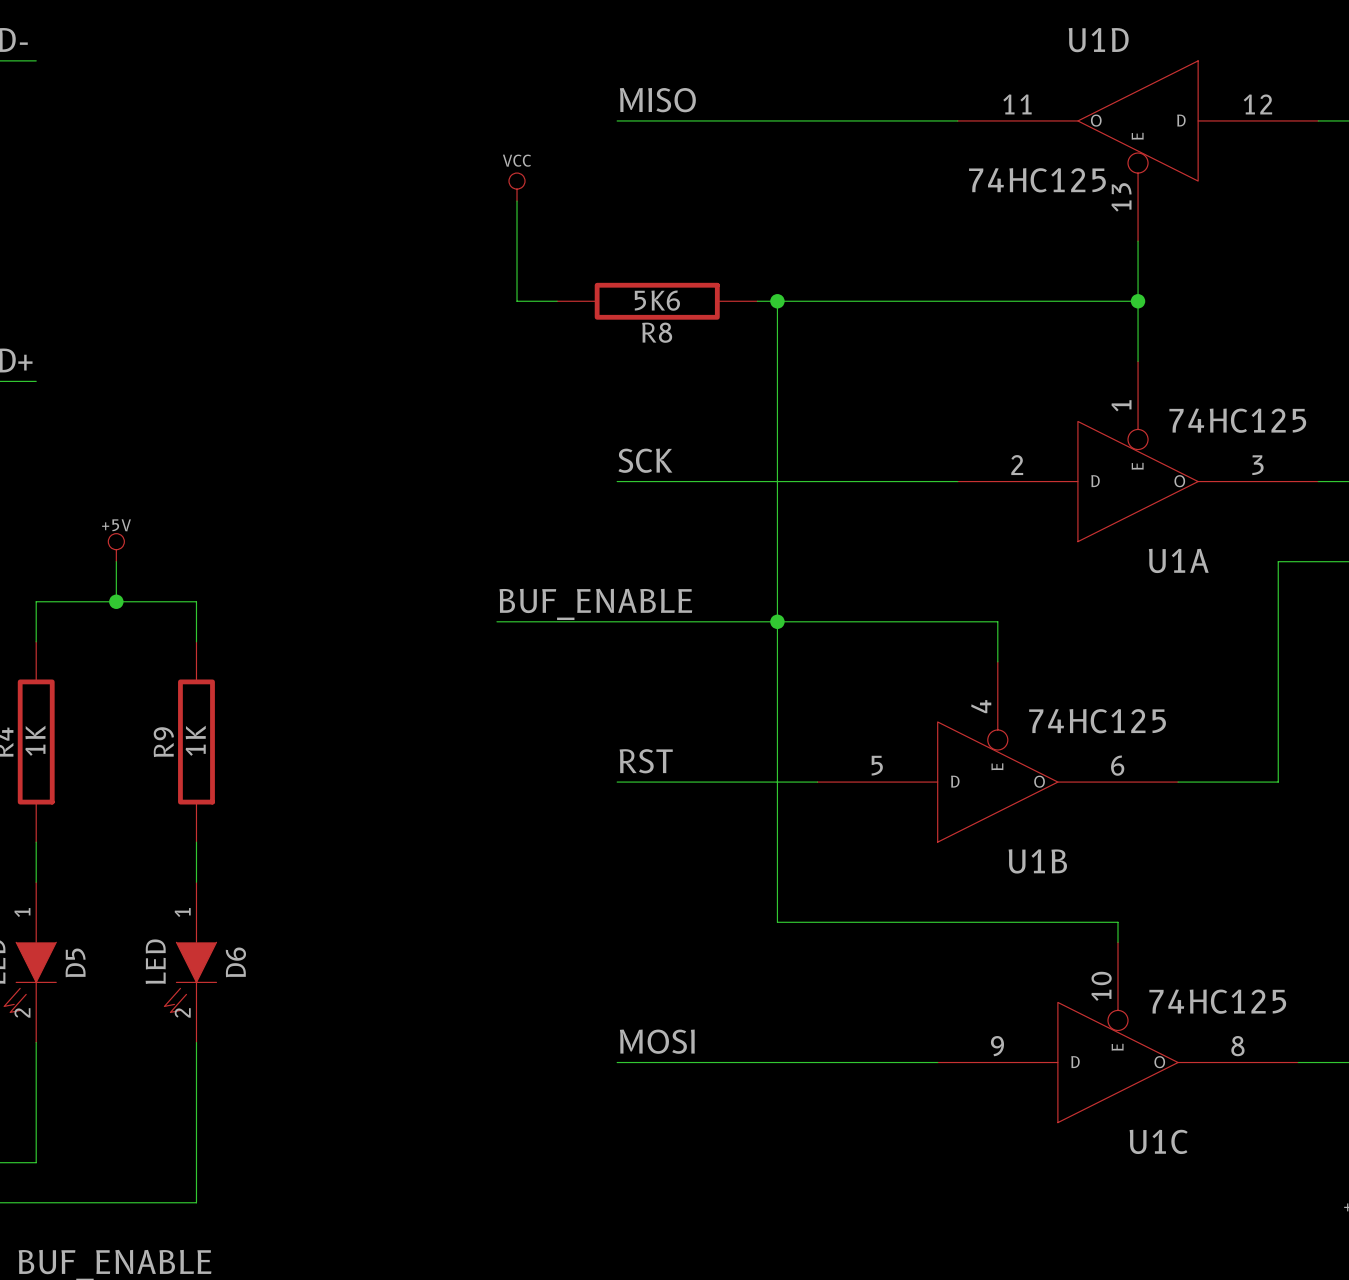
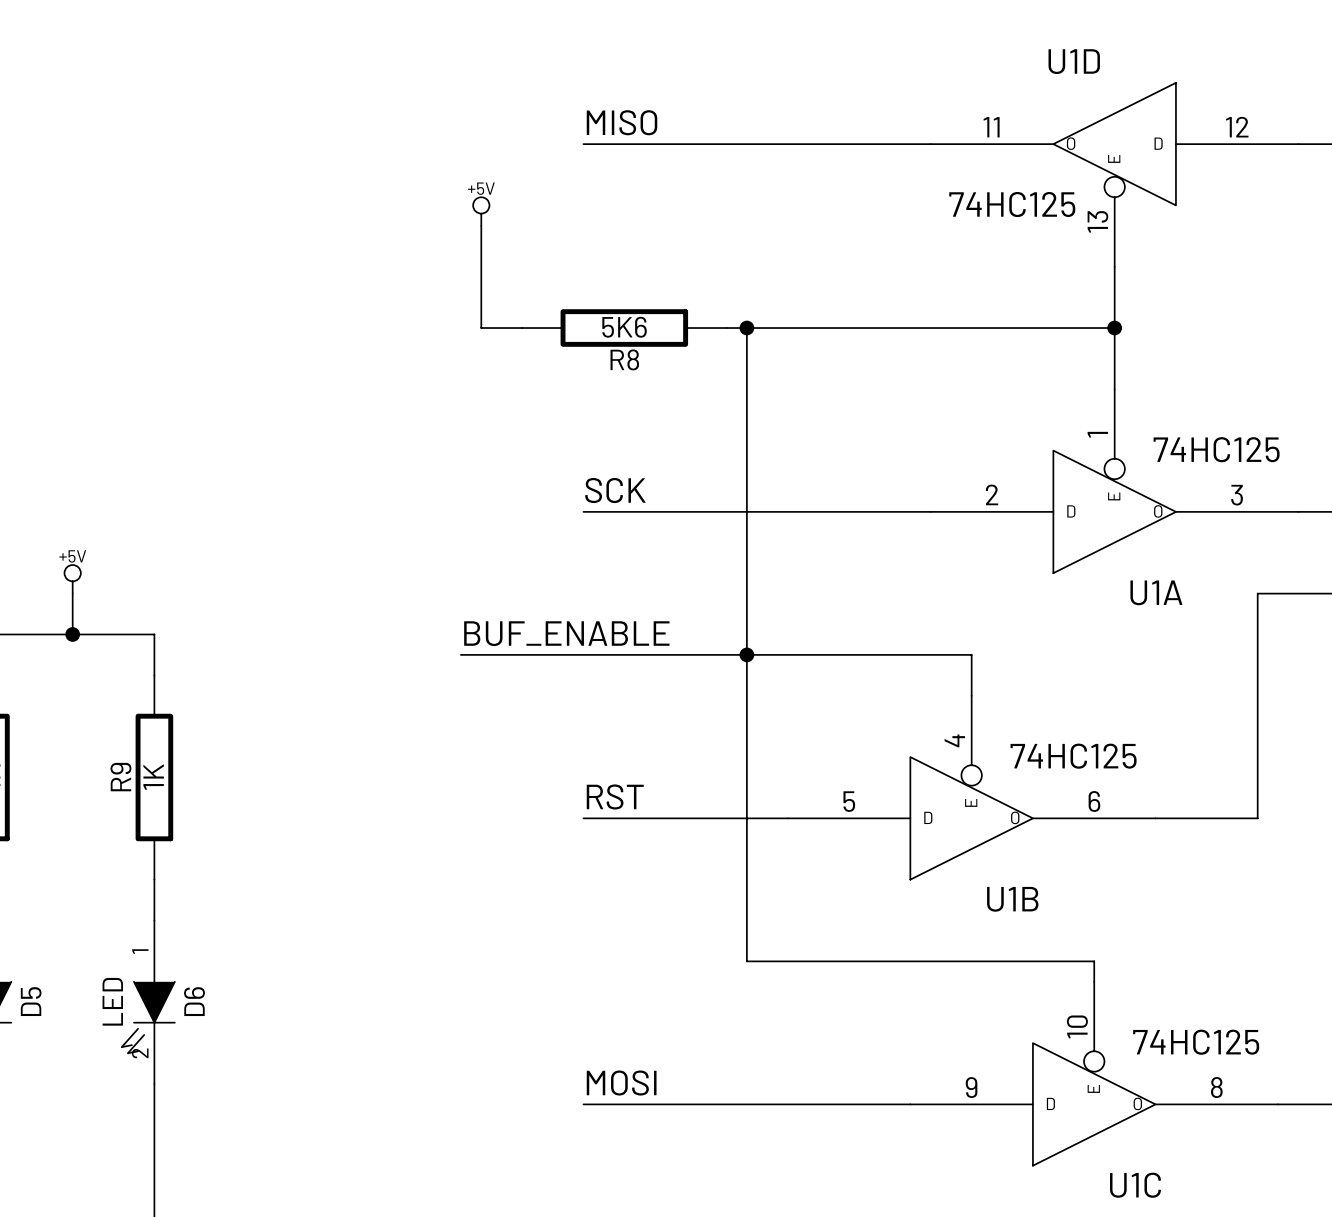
power symbol: VCC (517, 187) -> +5V (481, 211)

